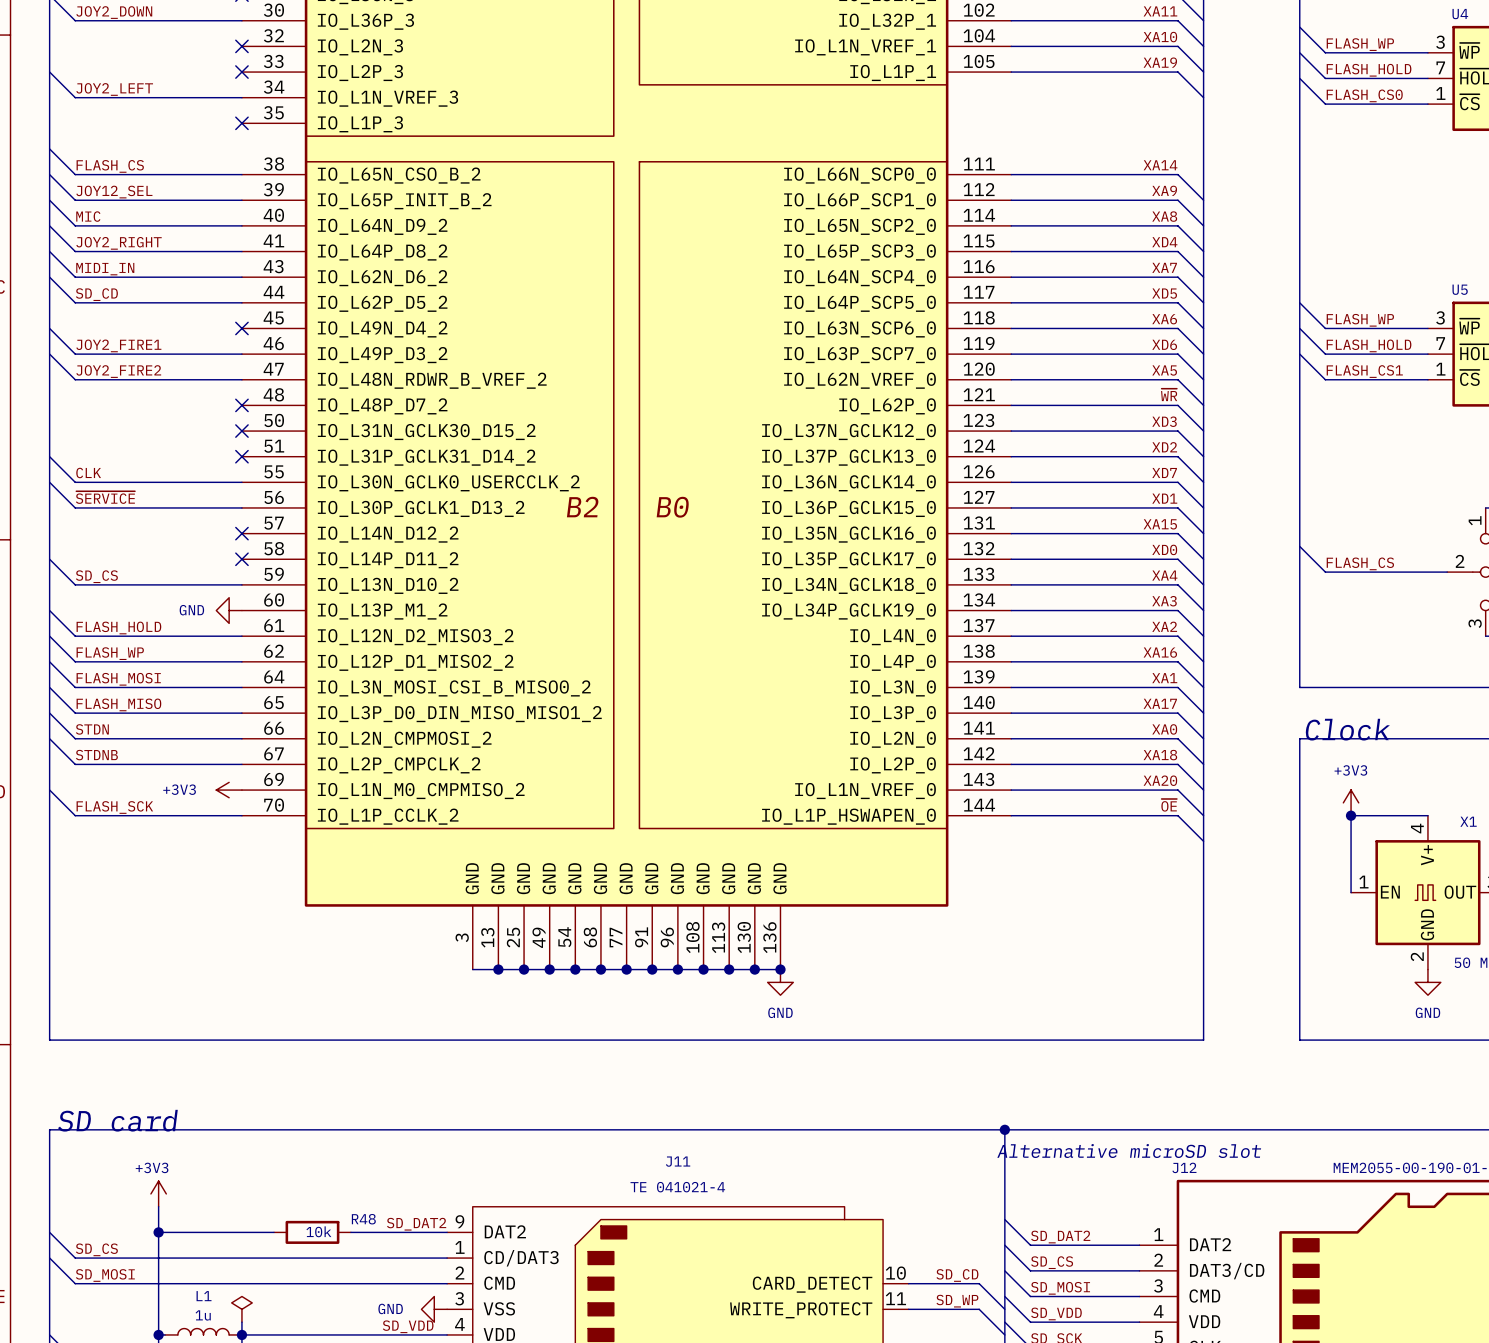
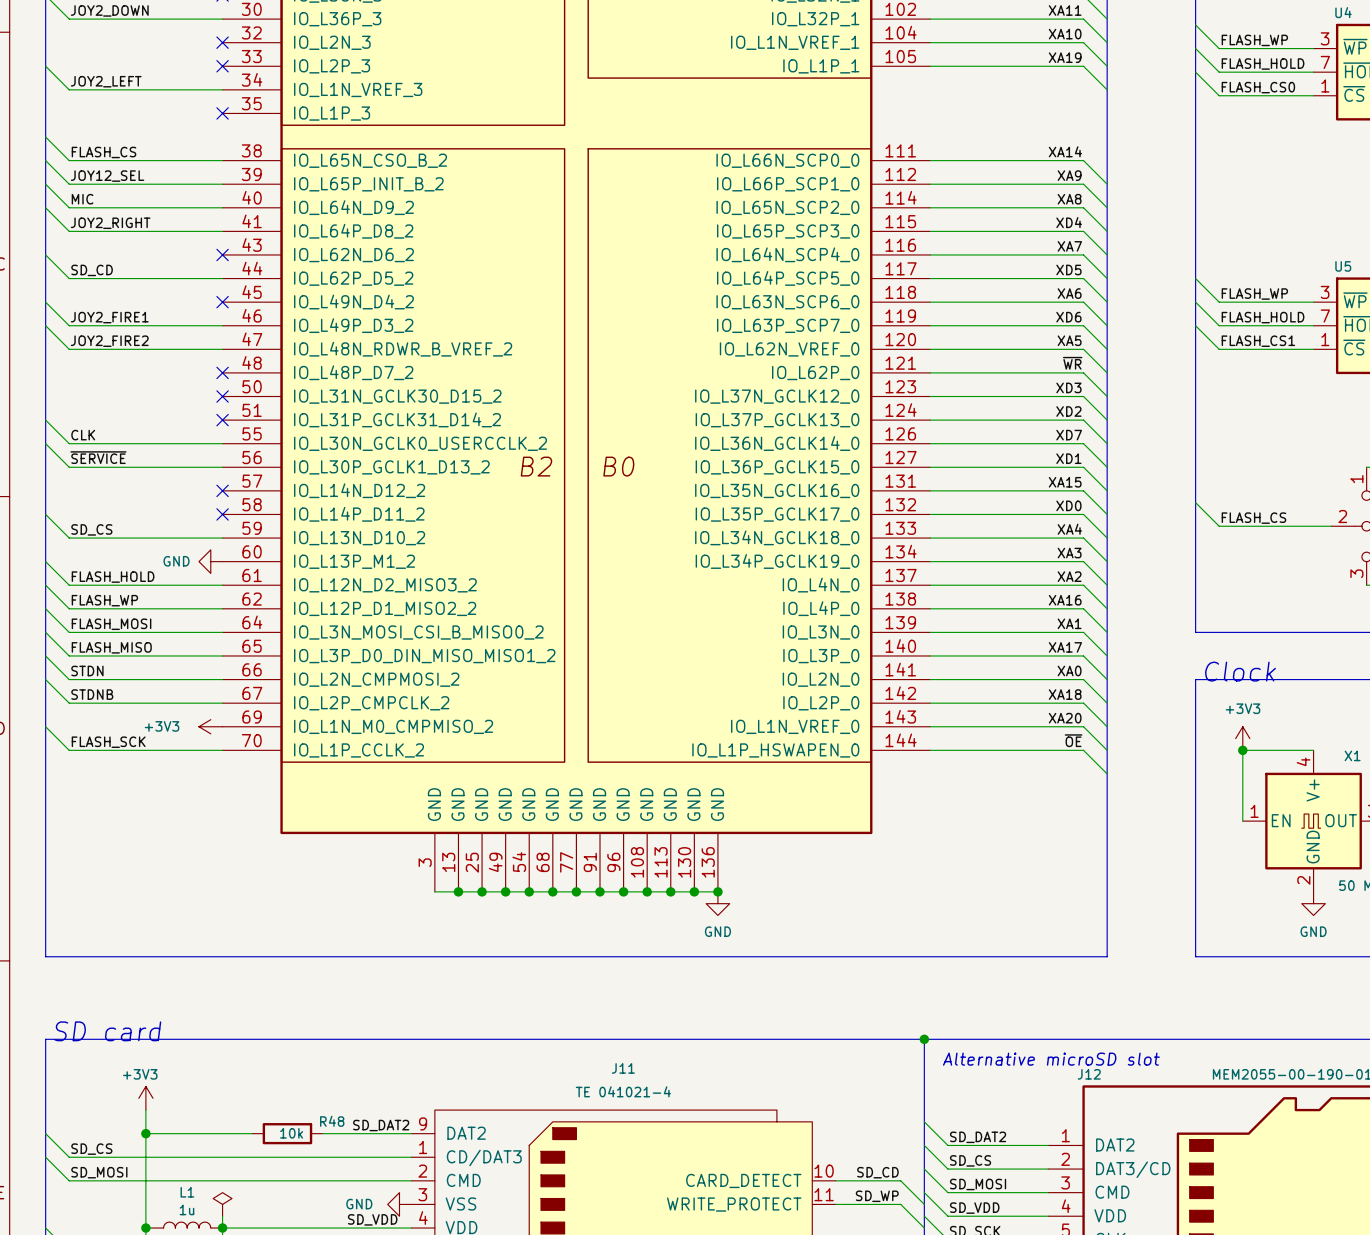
wire: (49, 251) (75, 277) -> none
label: MIDI_IN (105, 269) -> none
wire: (75, 277) (241, 277) -> none
no-connect mark: none -> (222, 254)

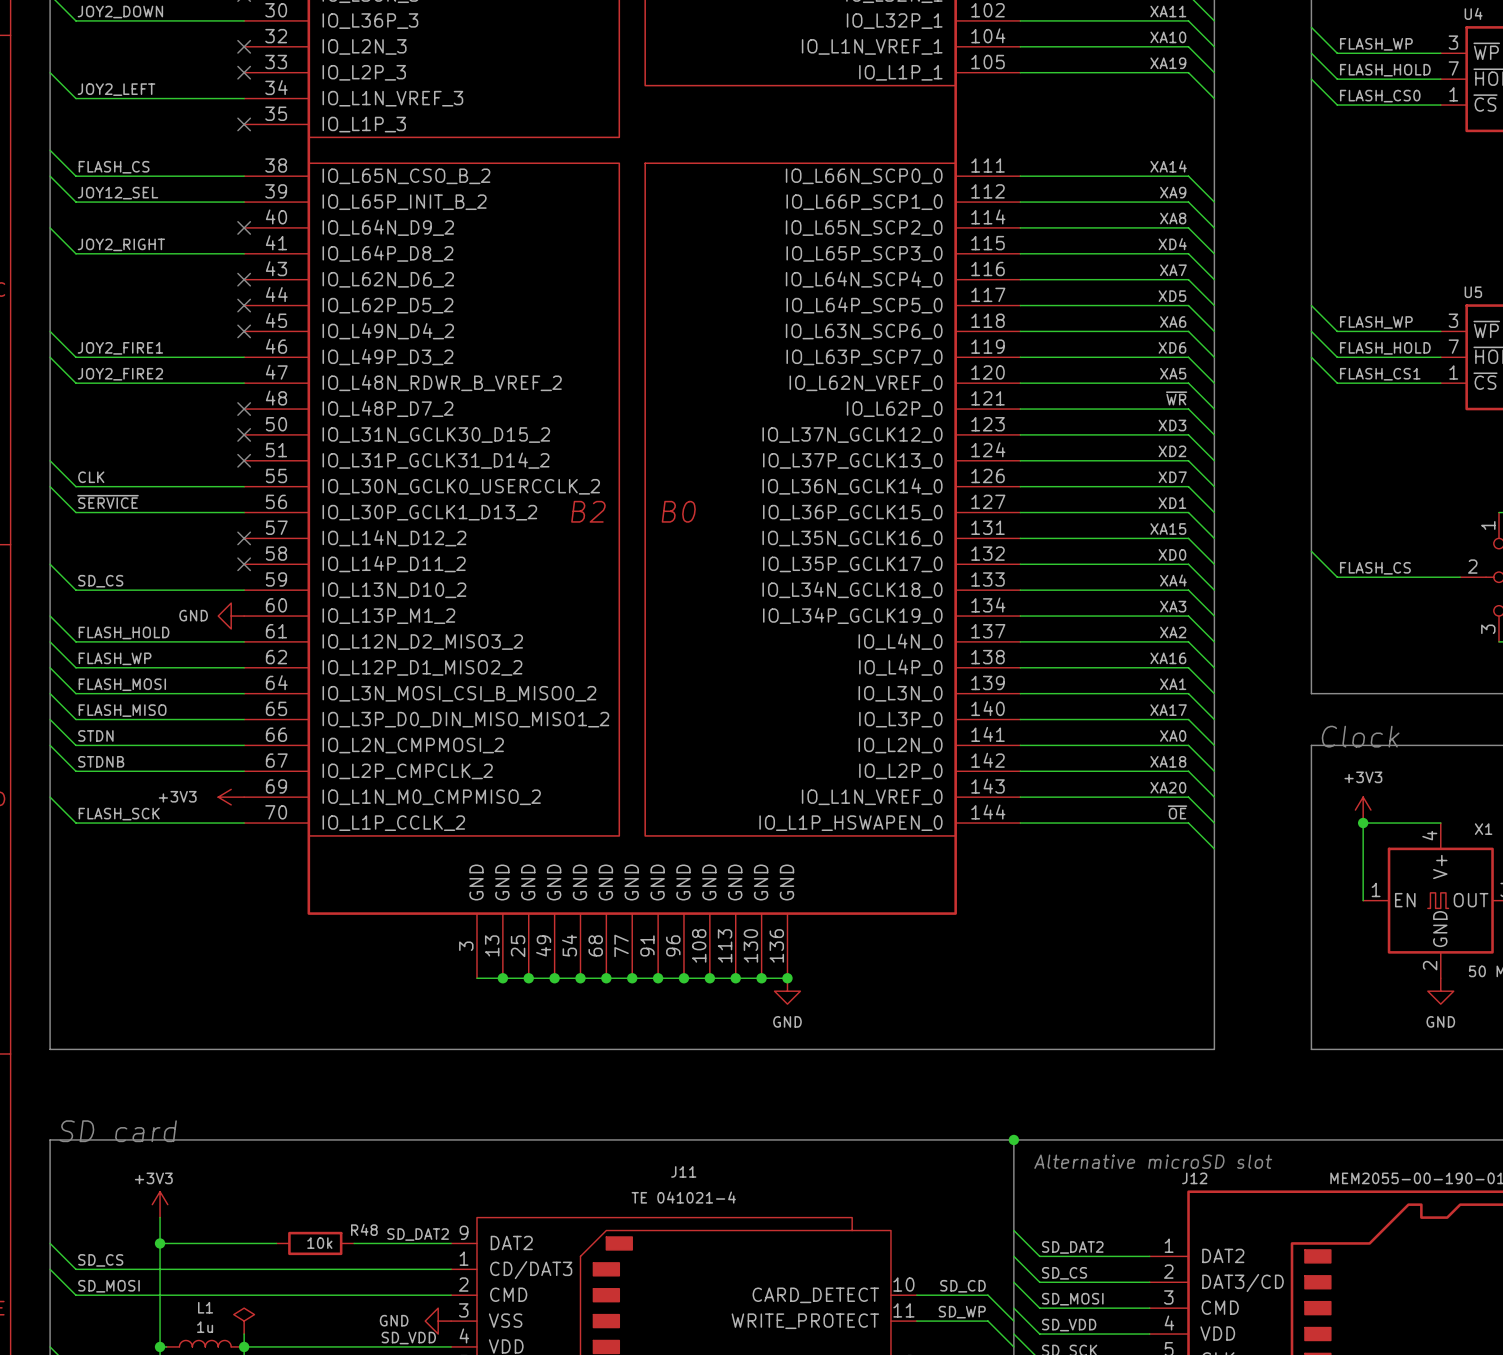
wire: (45, 184) (69, 207) (222, 207) -> none
label: MIC (82, 199) -> none
no-connect mark: none -> (244, 227)
wire: (45, 254) (69, 278) (222, 278) -> none
label: SD_CD (92, 270) -> none
no-connect mark: none -> (244, 305)

